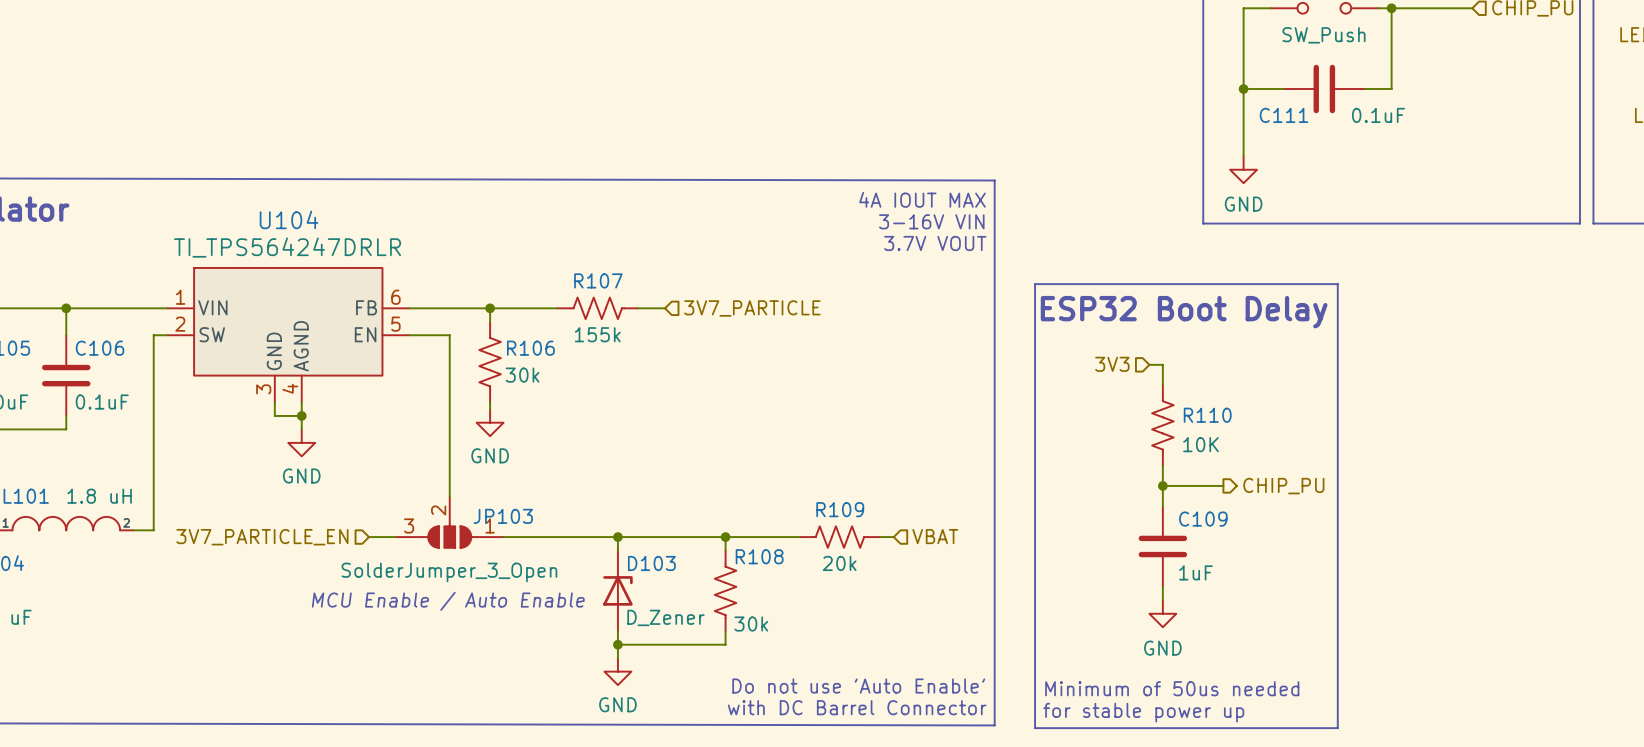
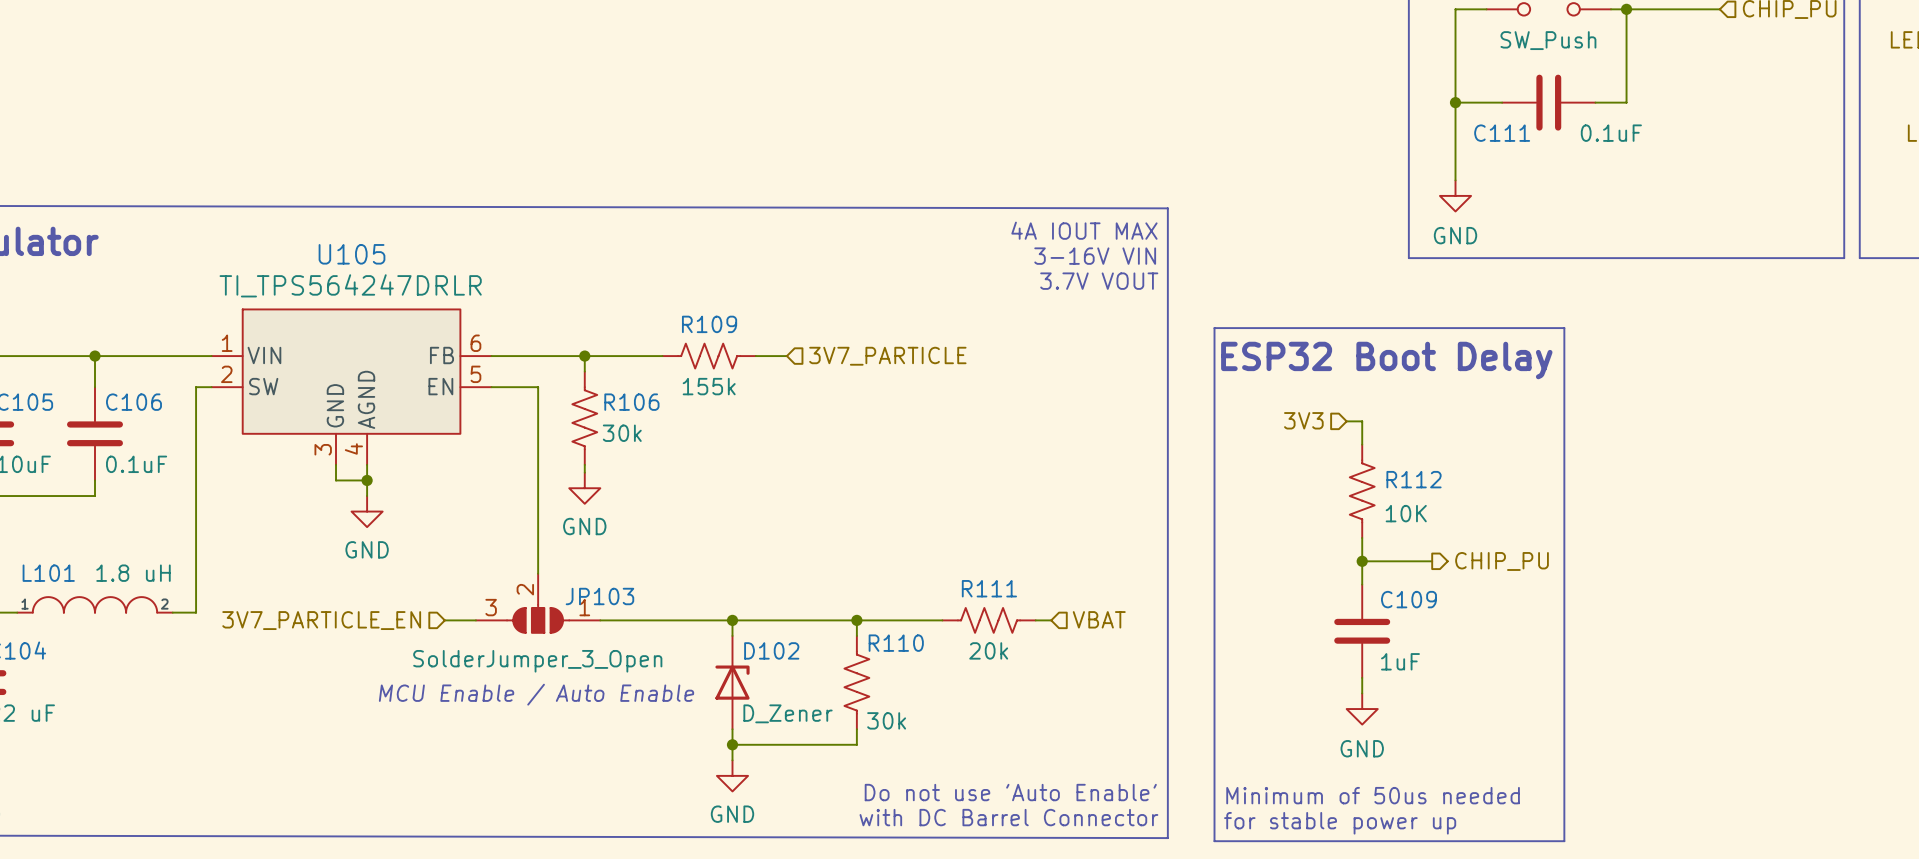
U104 name: U104 (289, 219) -> U105 (351, 254)
R107 name: R107 (598, 280) -> R109 (709, 324)
R110 name: R110 (1207, 415) -> R112 (1414, 479)
R109 name: R109 (840, 509) -> R111 (989, 588)
R108 name: R108 (759, 556) -> R110 (896, 643)
D103 name: D103 (651, 563) -> D102 (771, 650)

